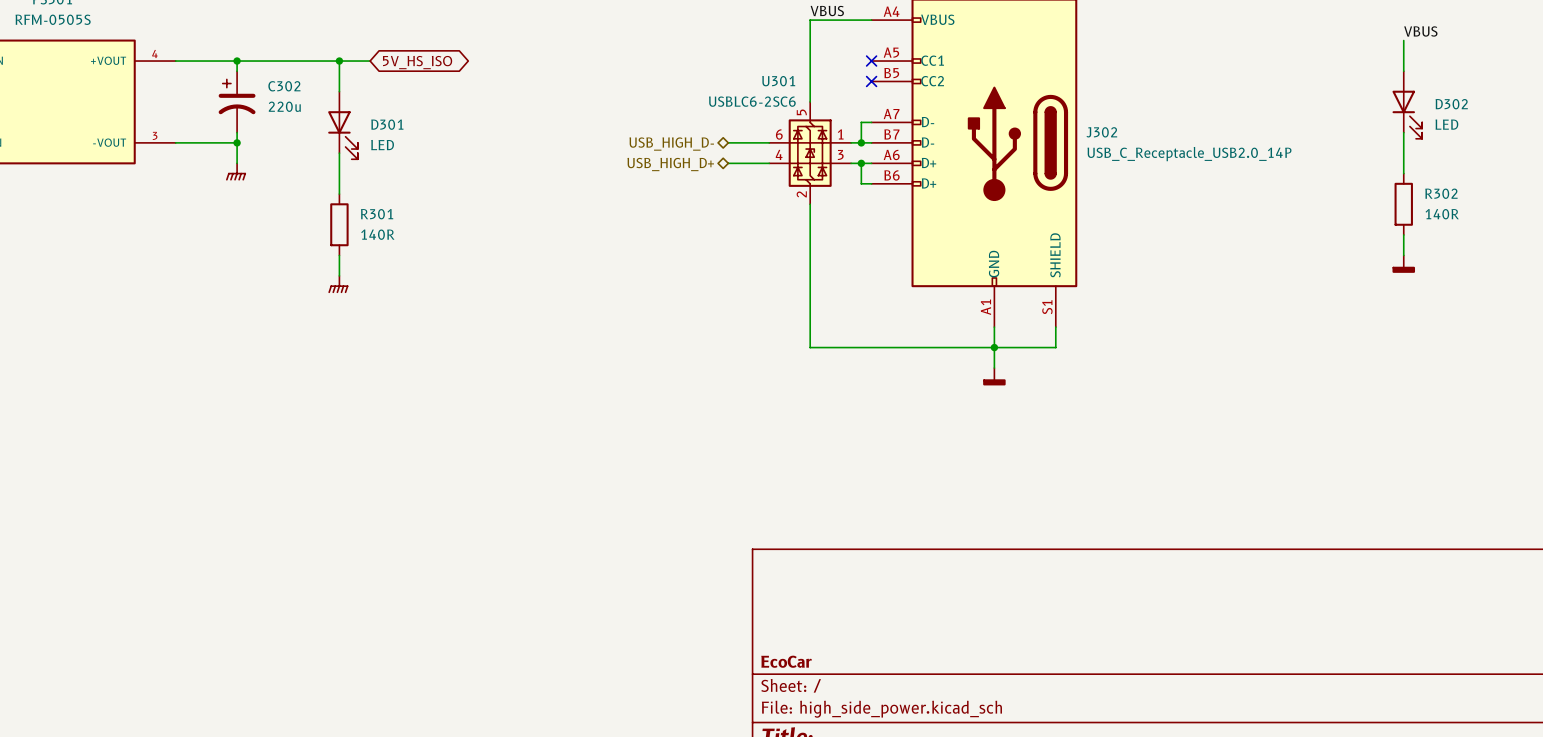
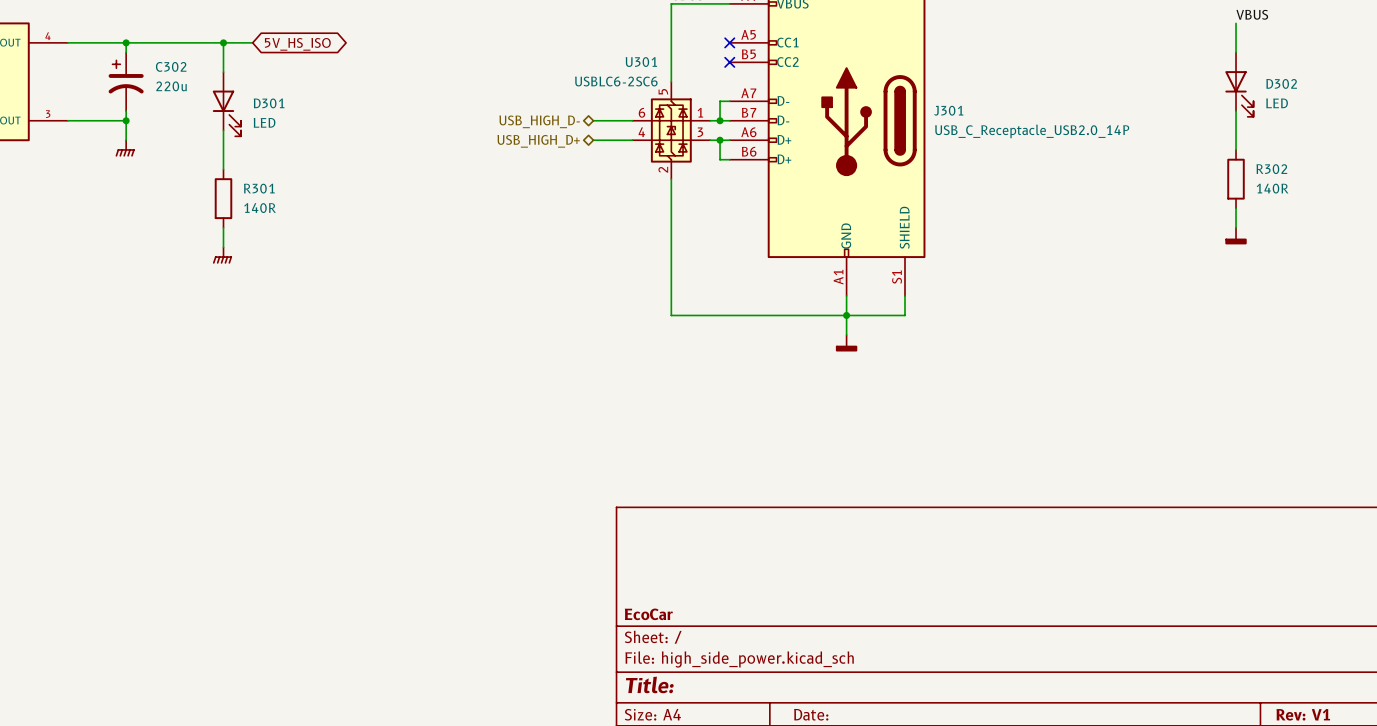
J302 name: J302 (1101, 132) -> J301 (948, 110)

